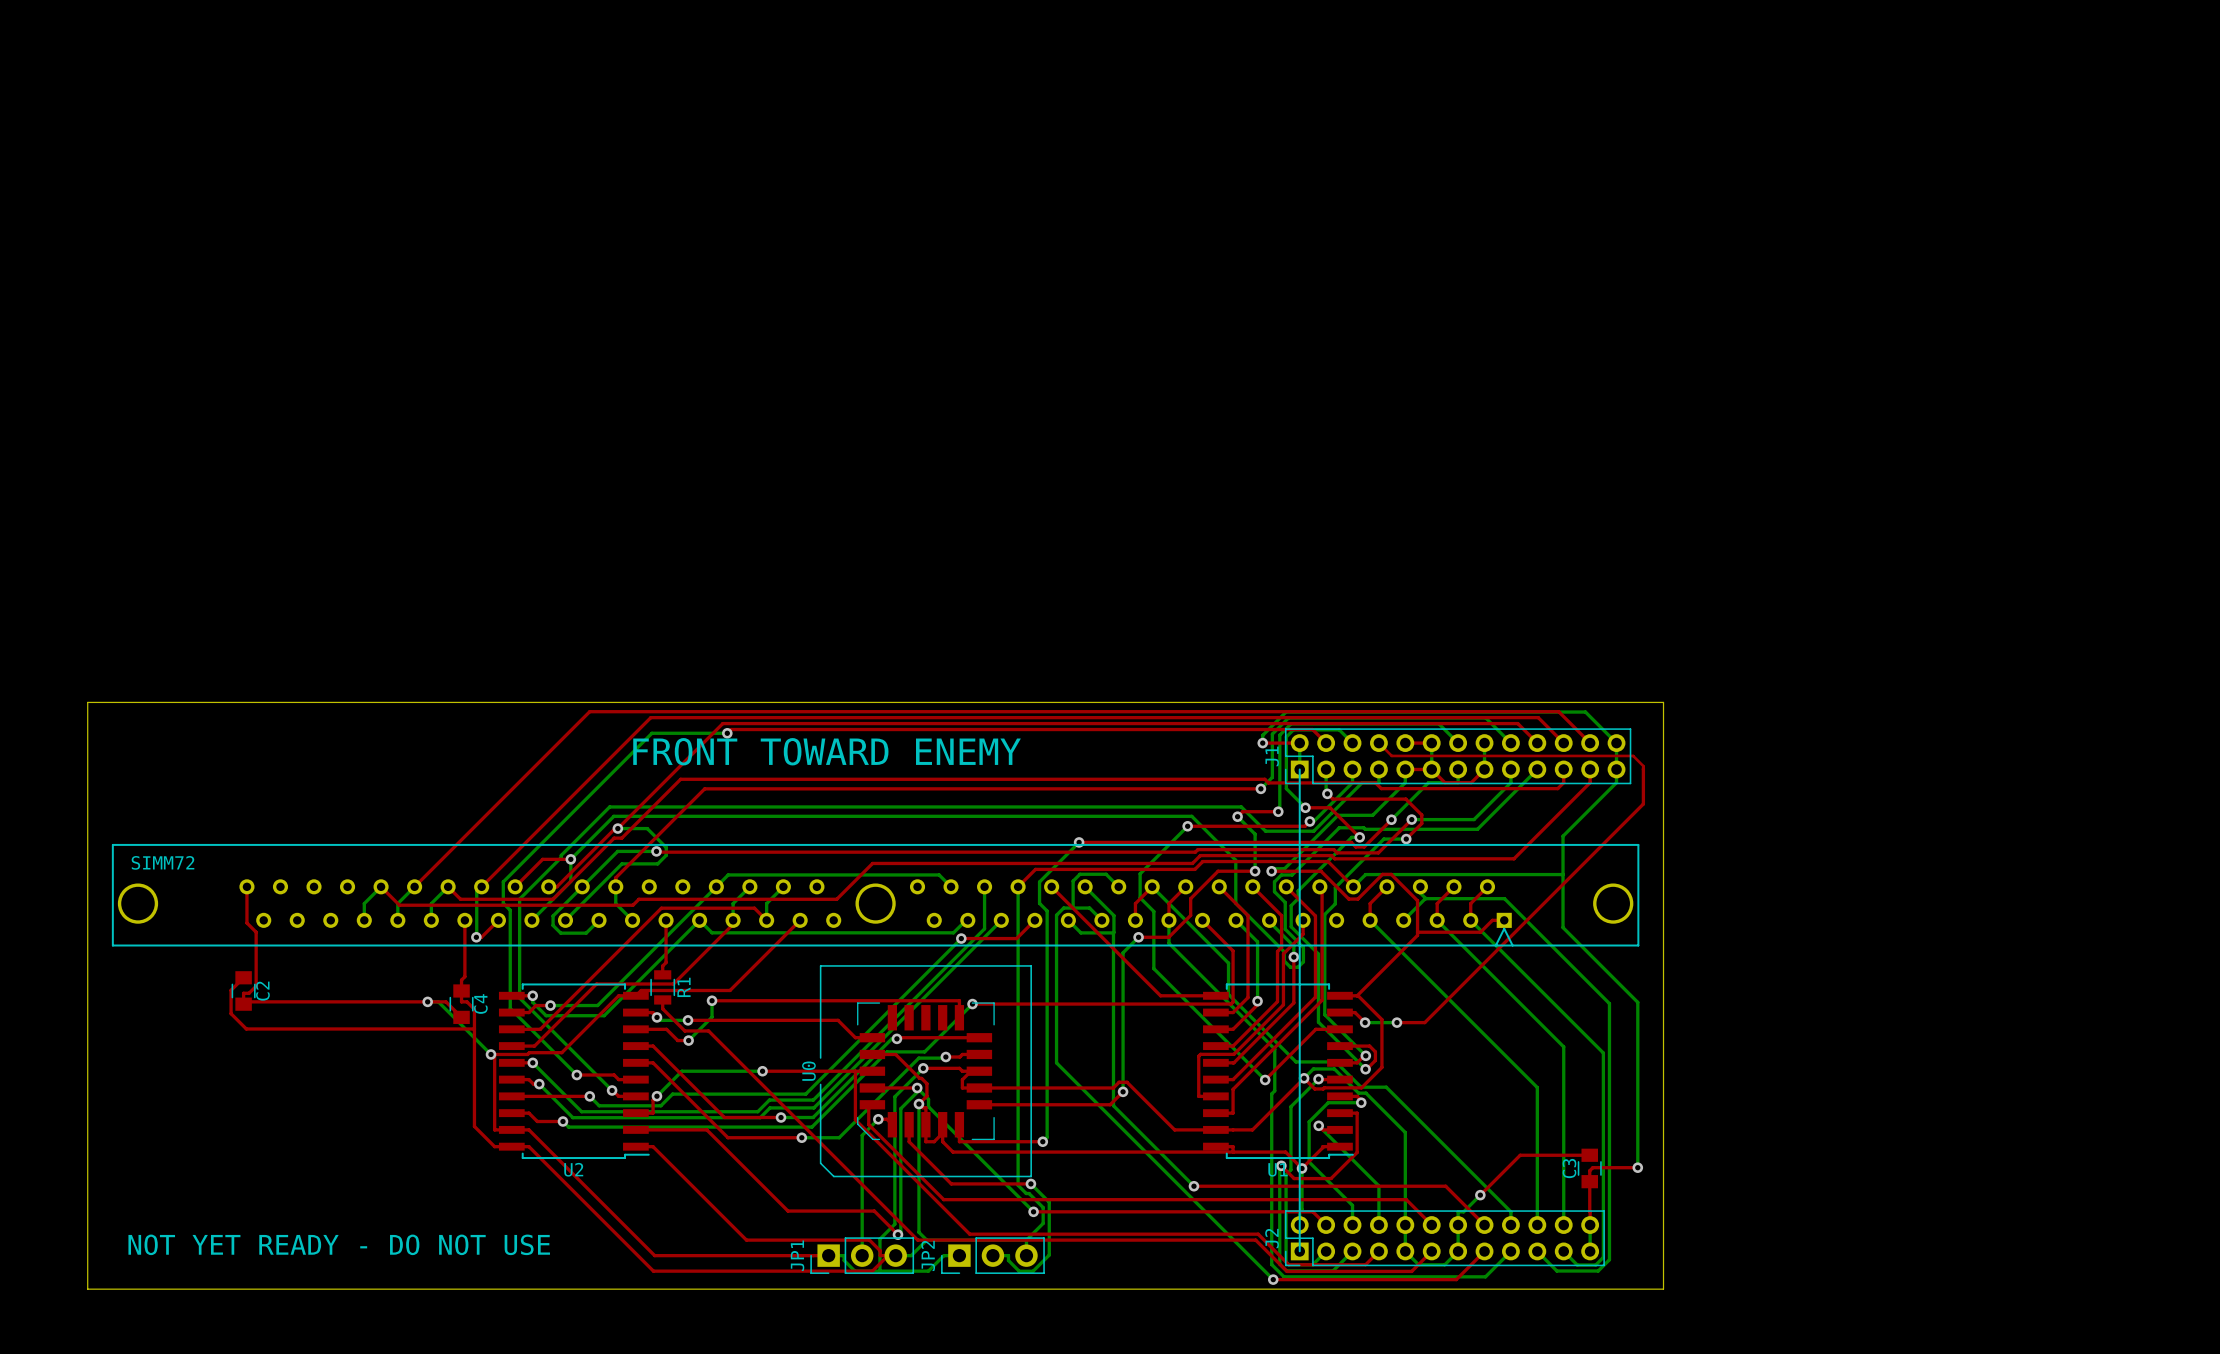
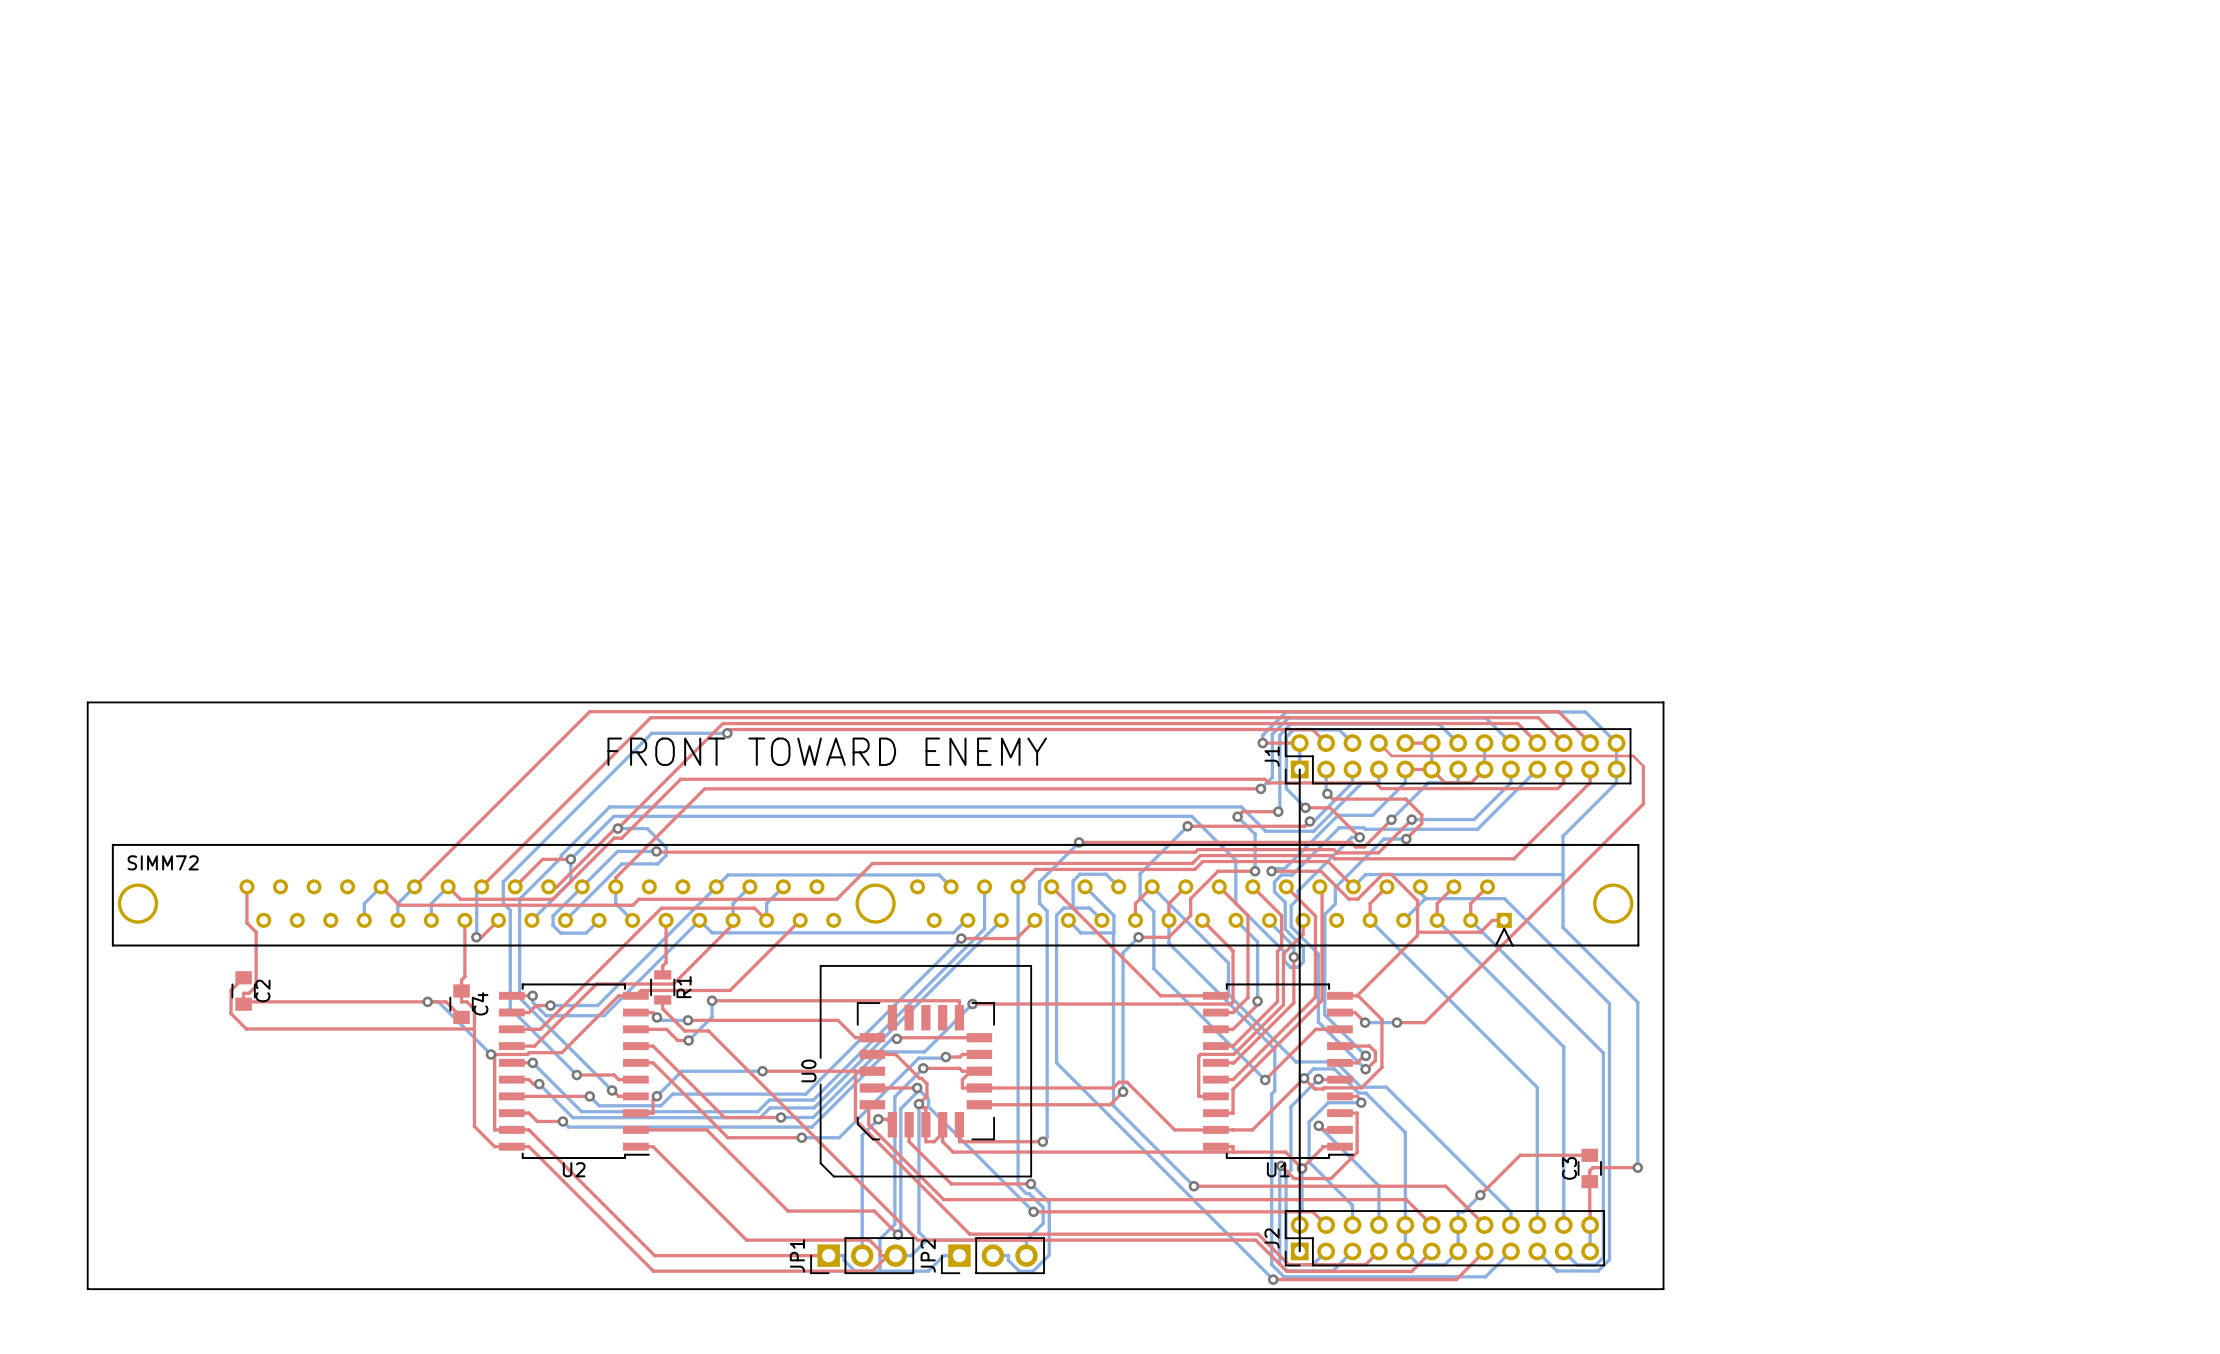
text: NOT YET READY - DO NOT USE (339, 1244) -> none

